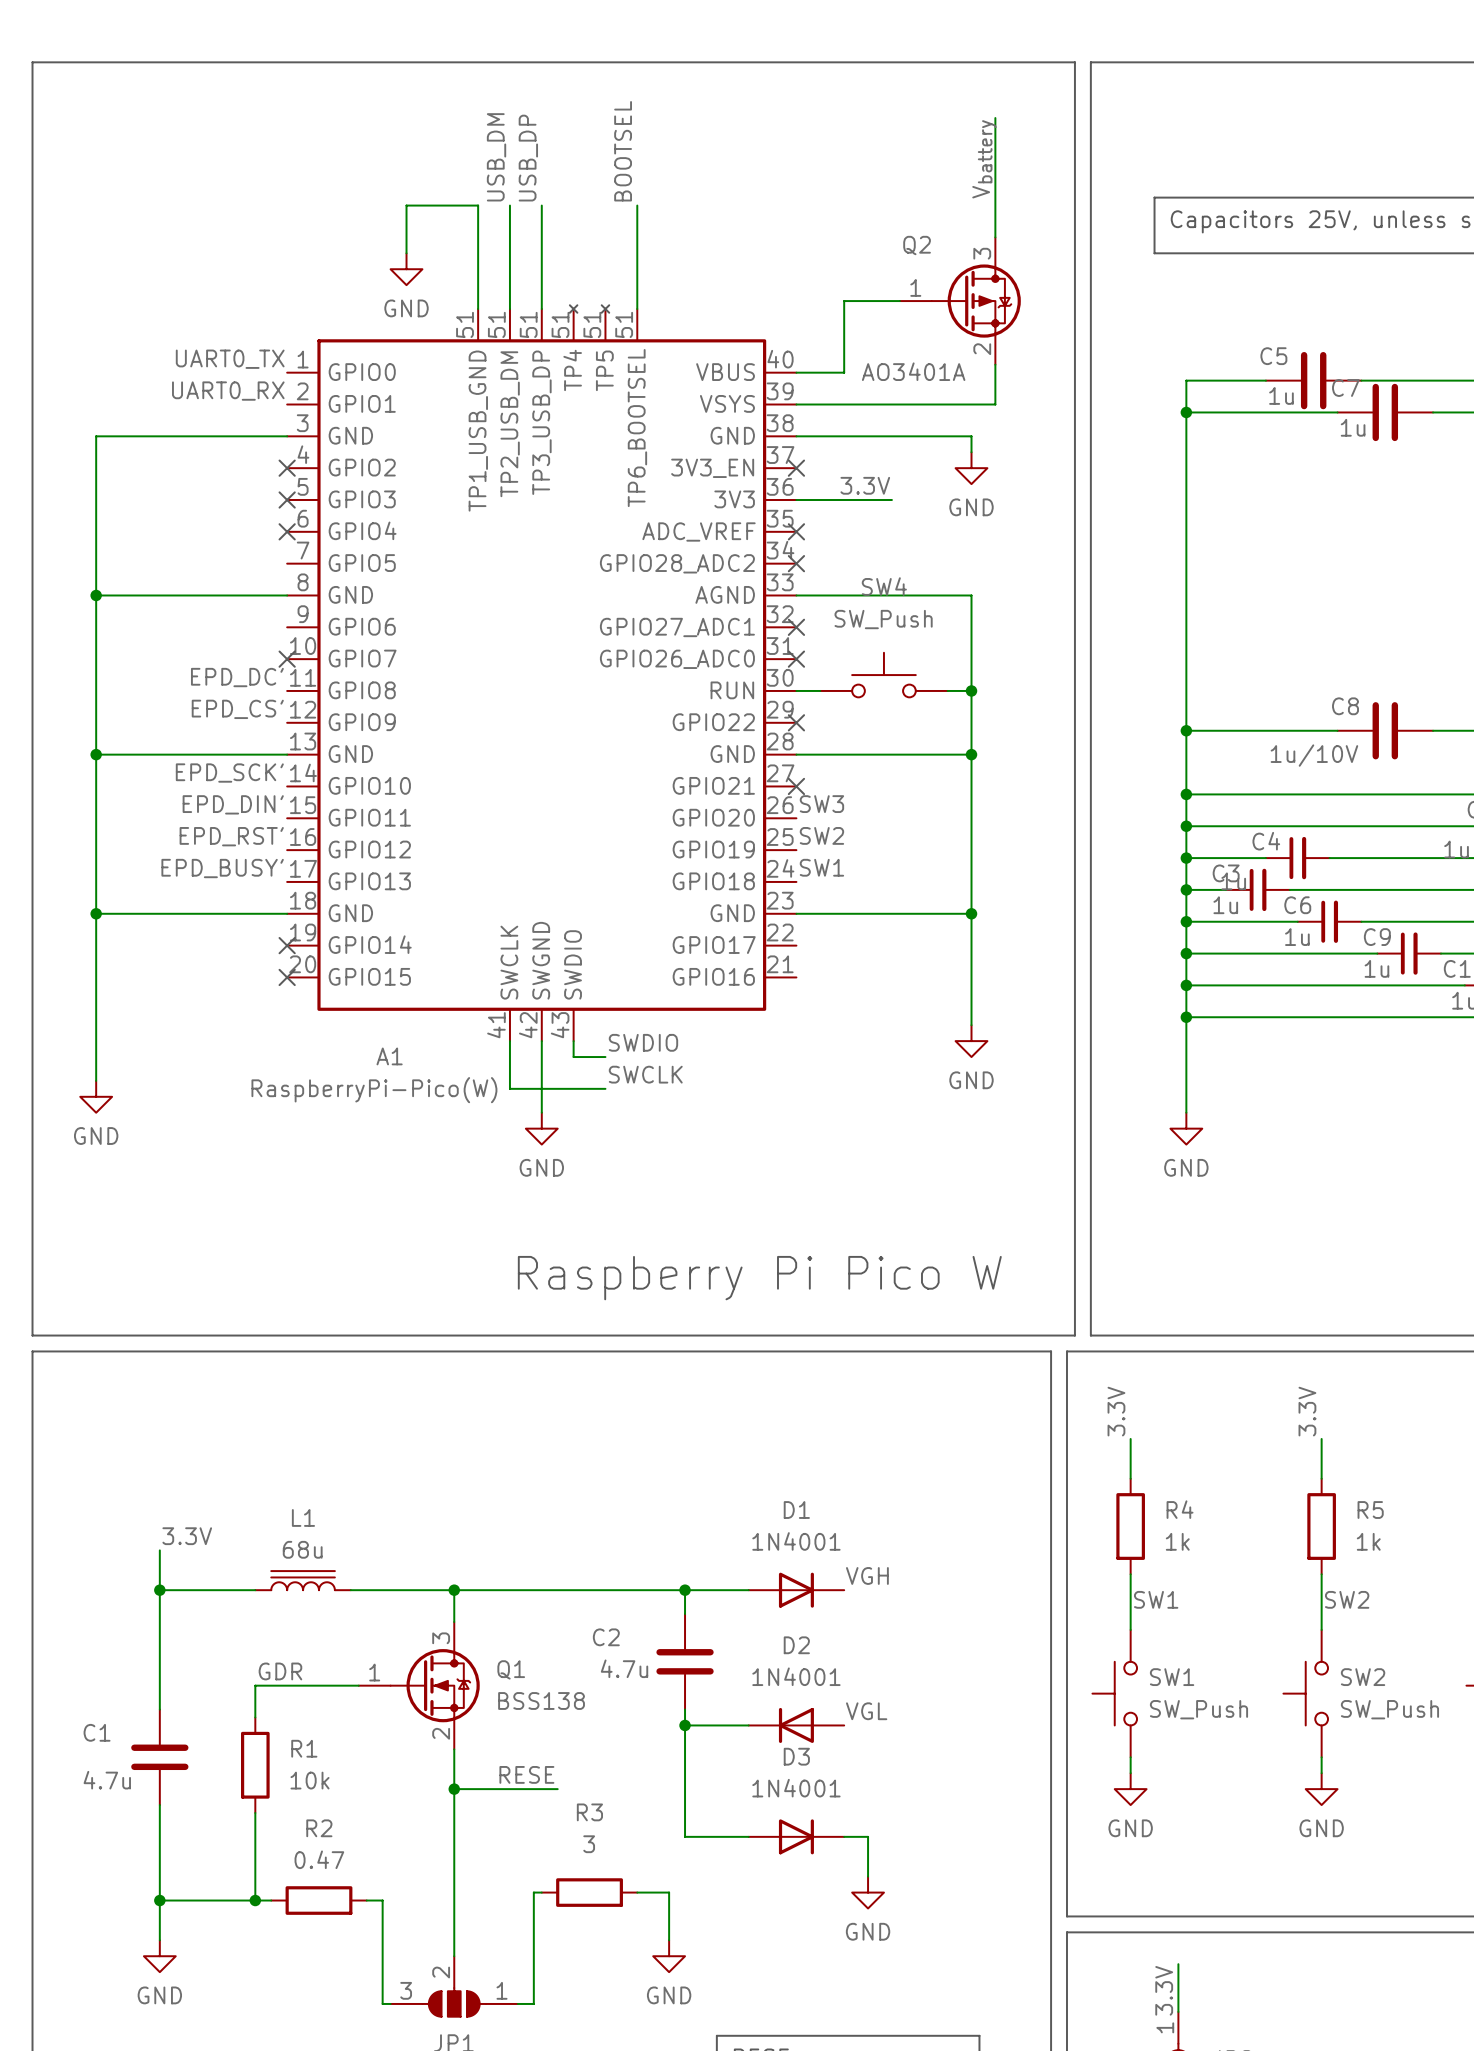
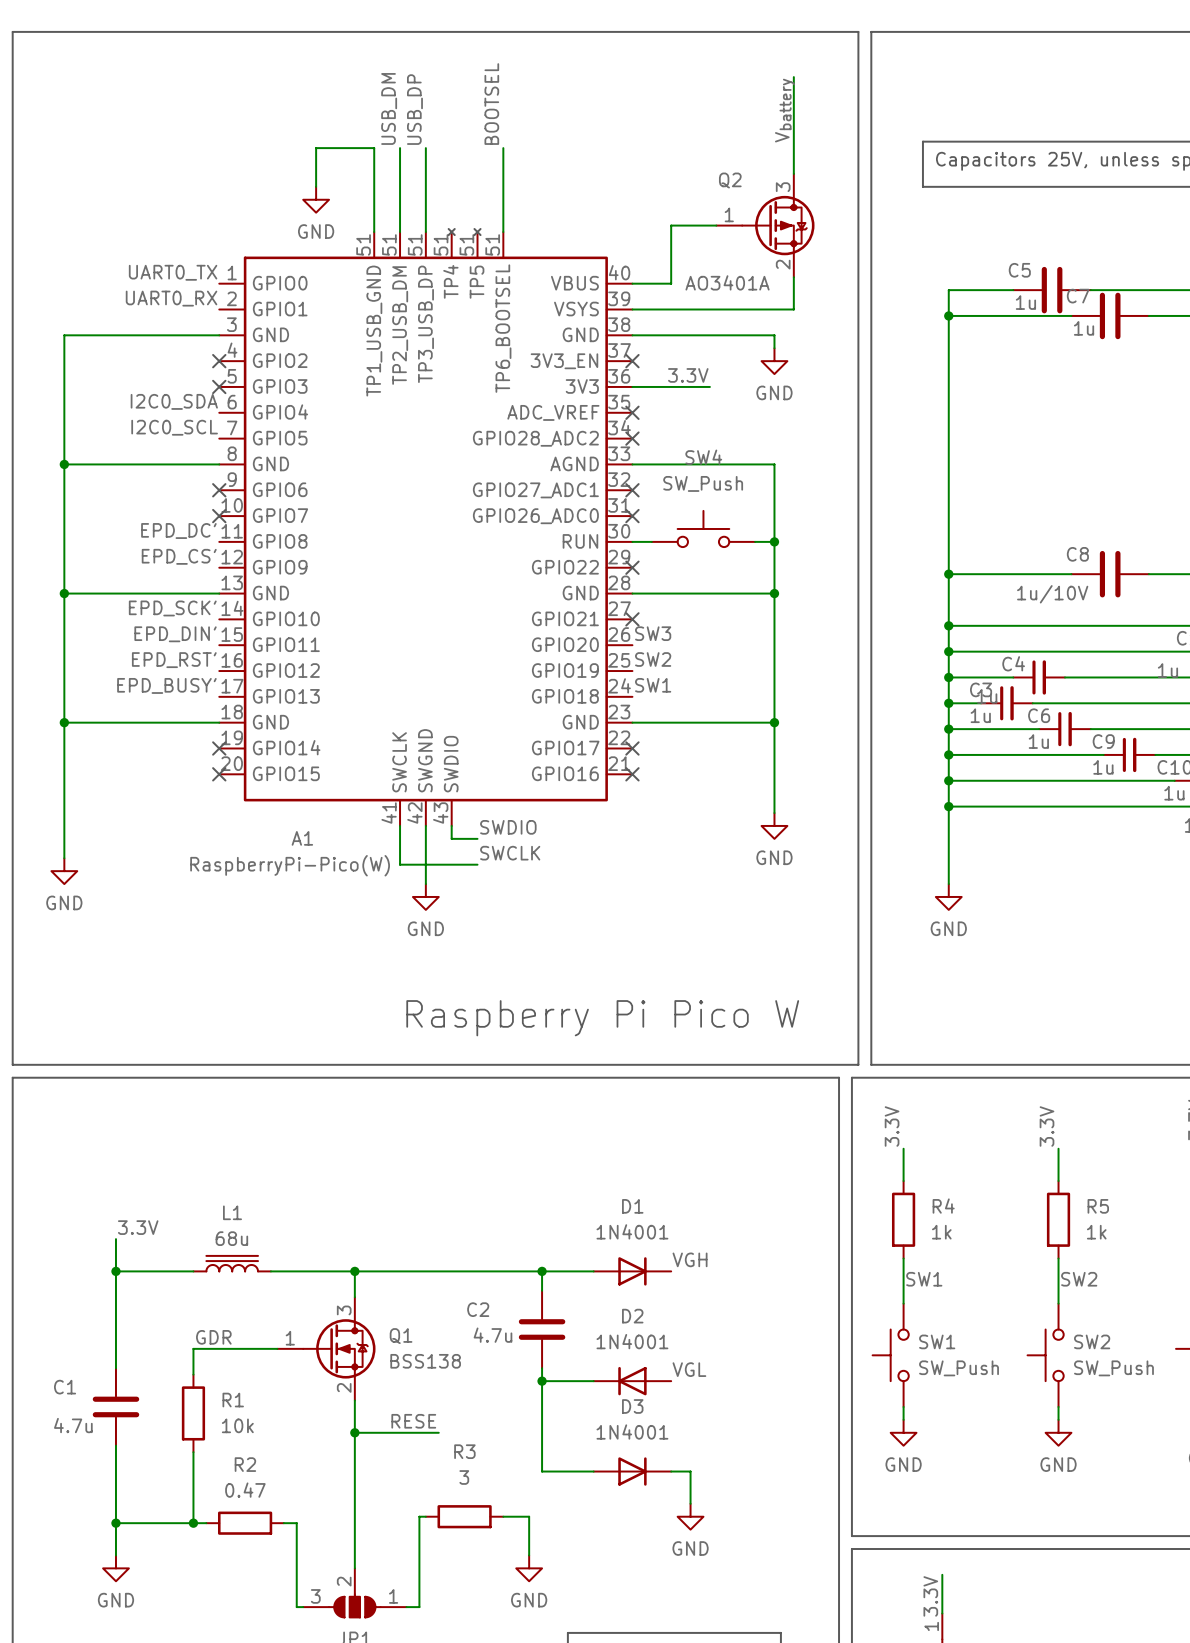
label: none -> I2C0_SDA (174, 401)
no-connect mark: (287, 531) -> none
label: none -> I2C0_SCL (174, 427)
no-connect mark: none -> (219, 490)
no-connect mark: none -> (632, 748)
no-connect mark: none -> (632, 774)

